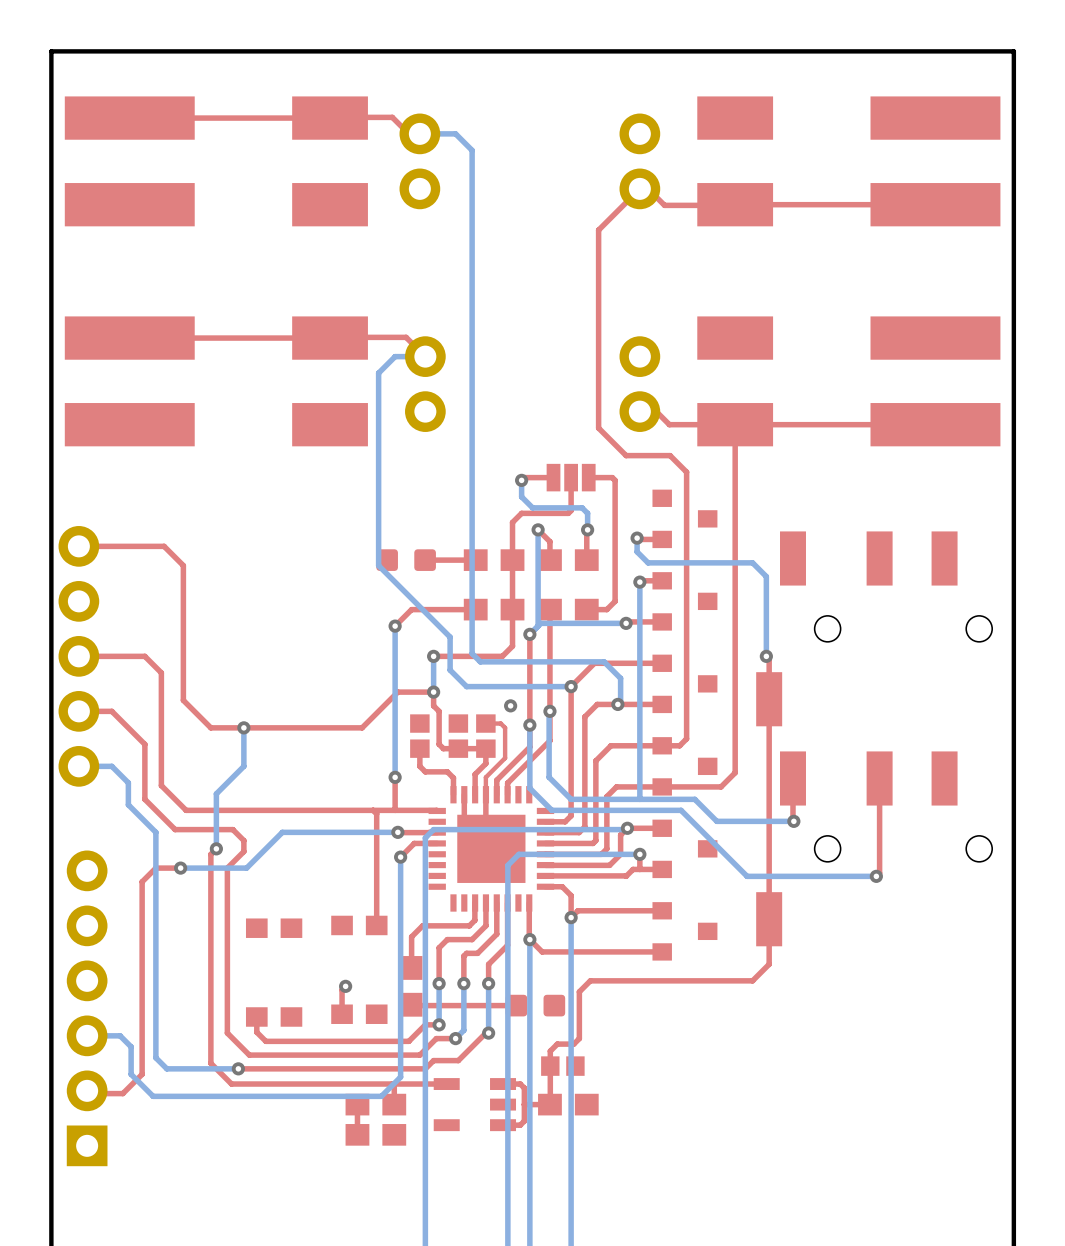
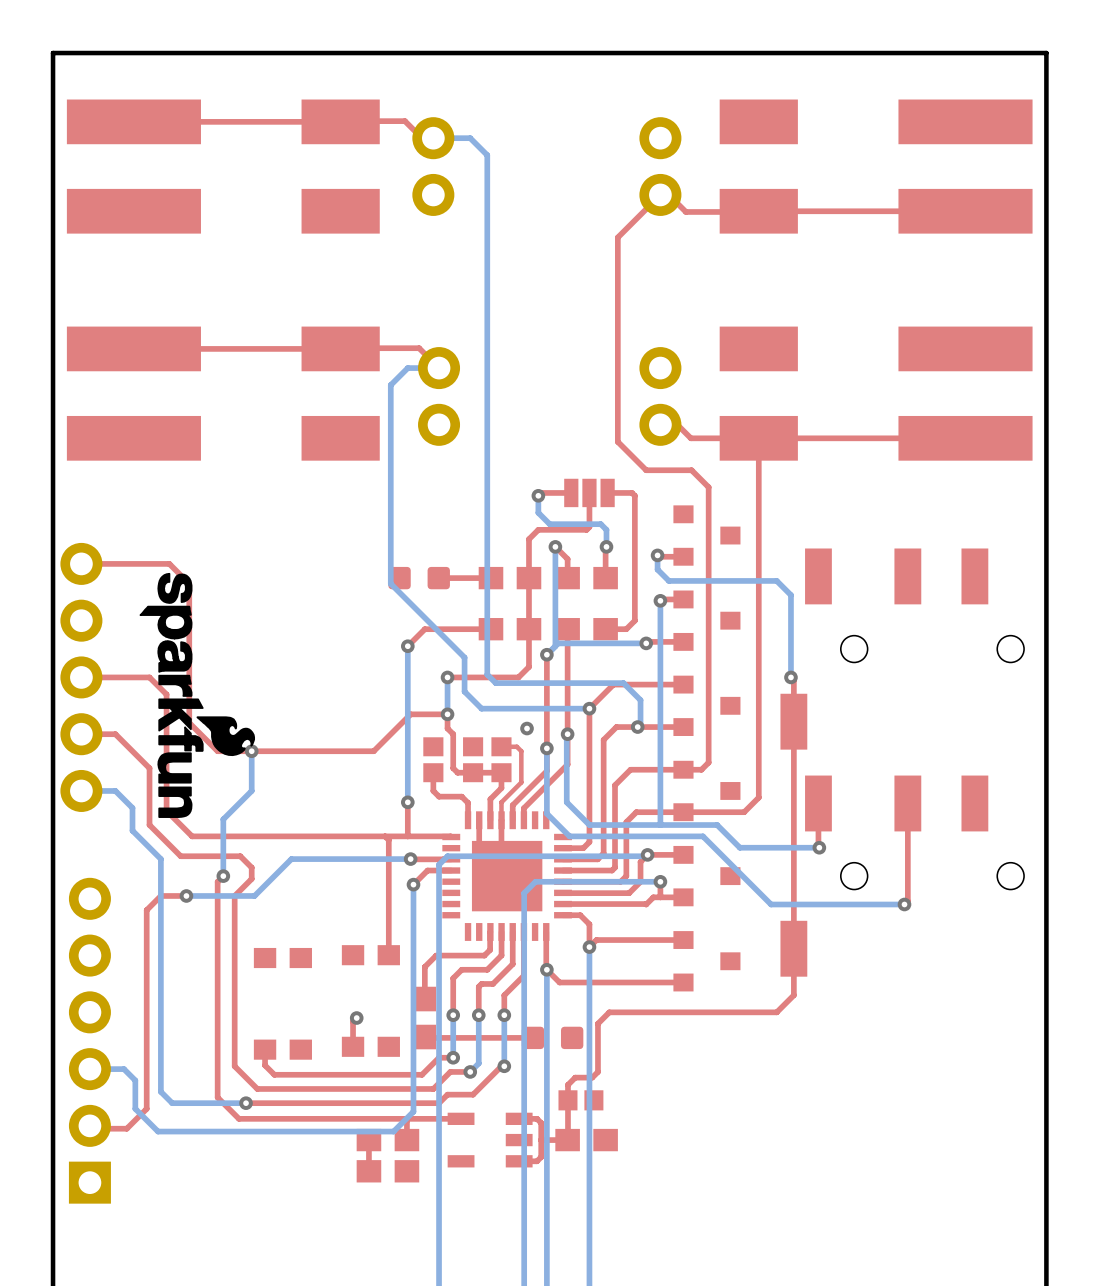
drawing: none -> [139, 572, 256, 818]

